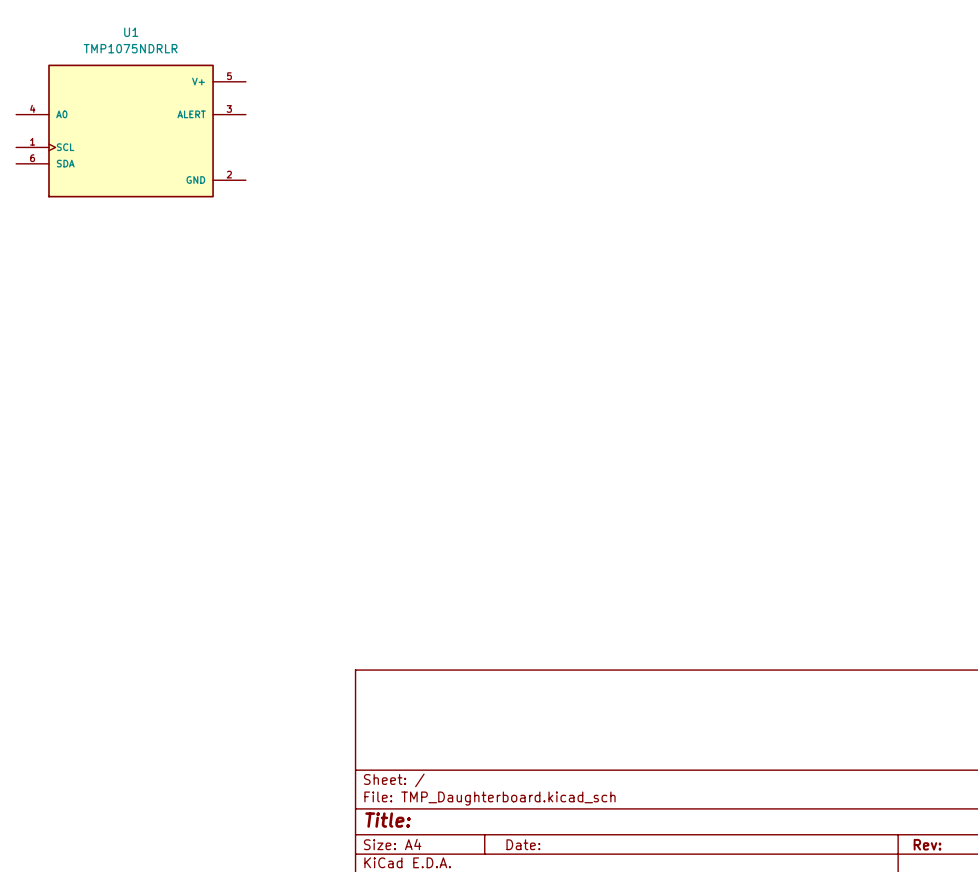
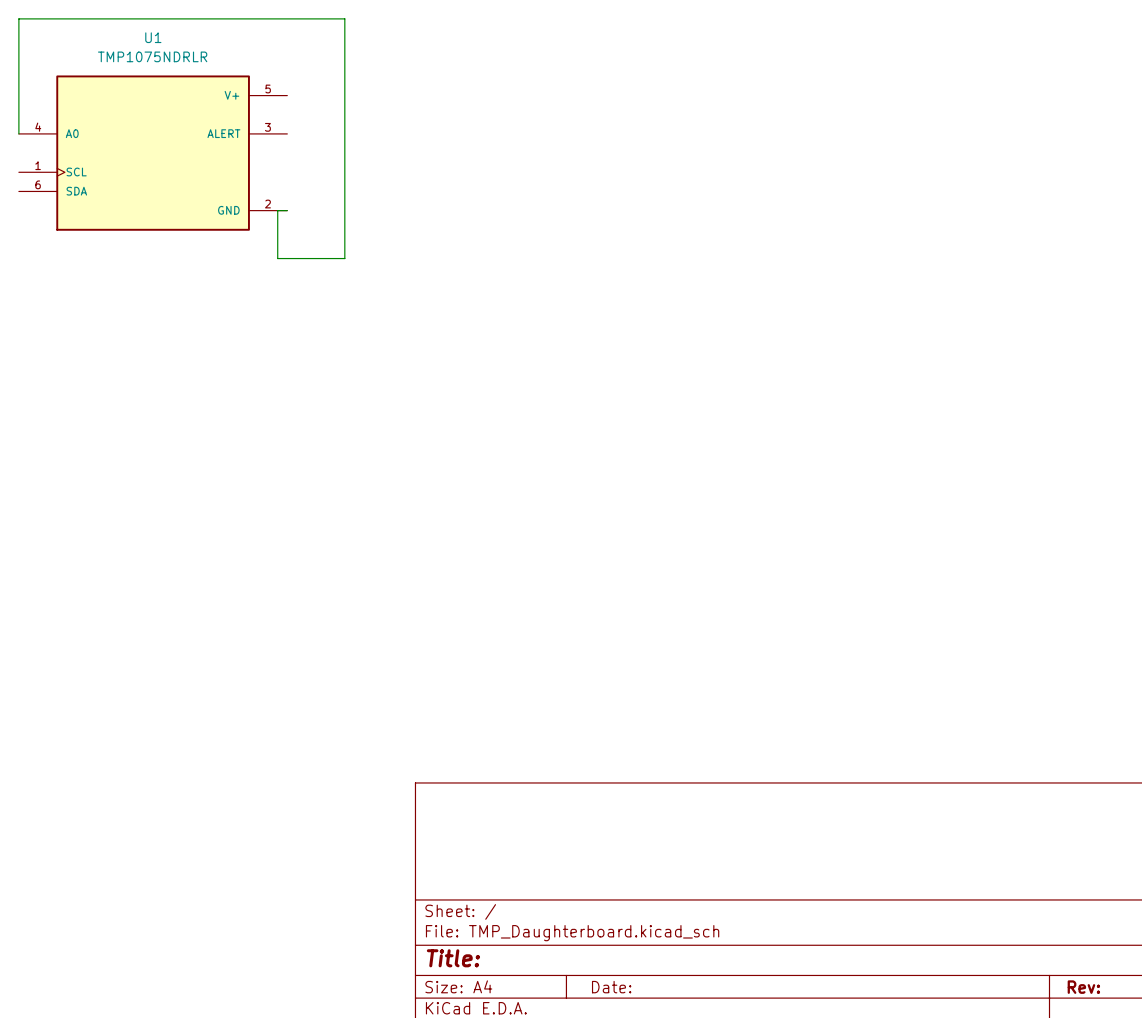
wire: none -> (18, 133) (18, 18) (344, 18) (344, 258) (277, 258) (277, 210) (287, 210)

